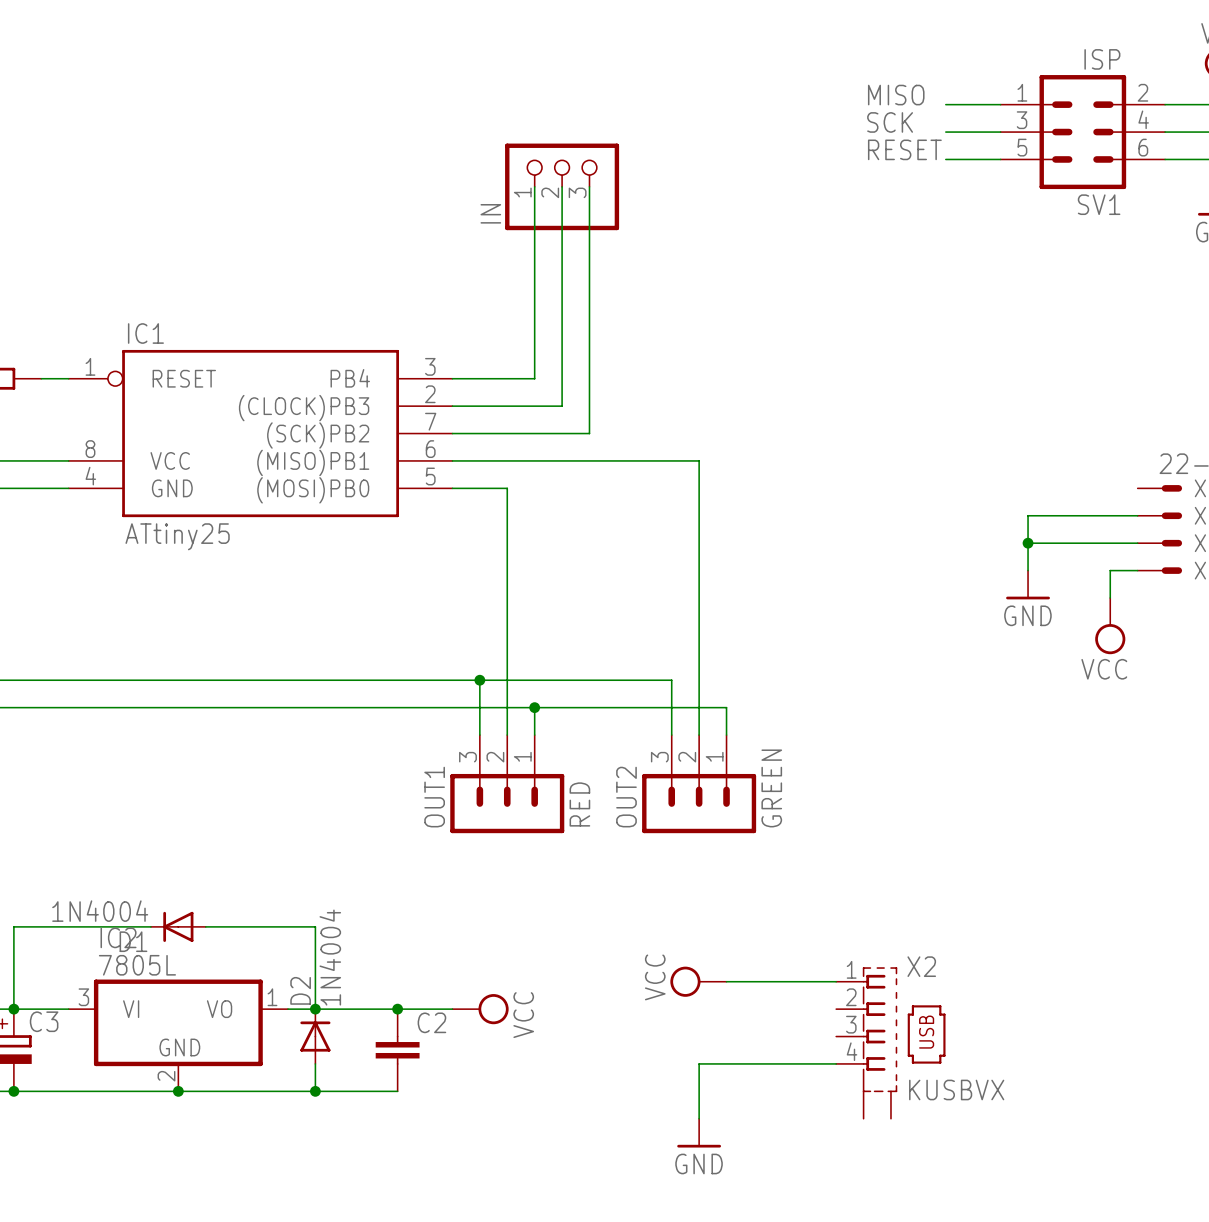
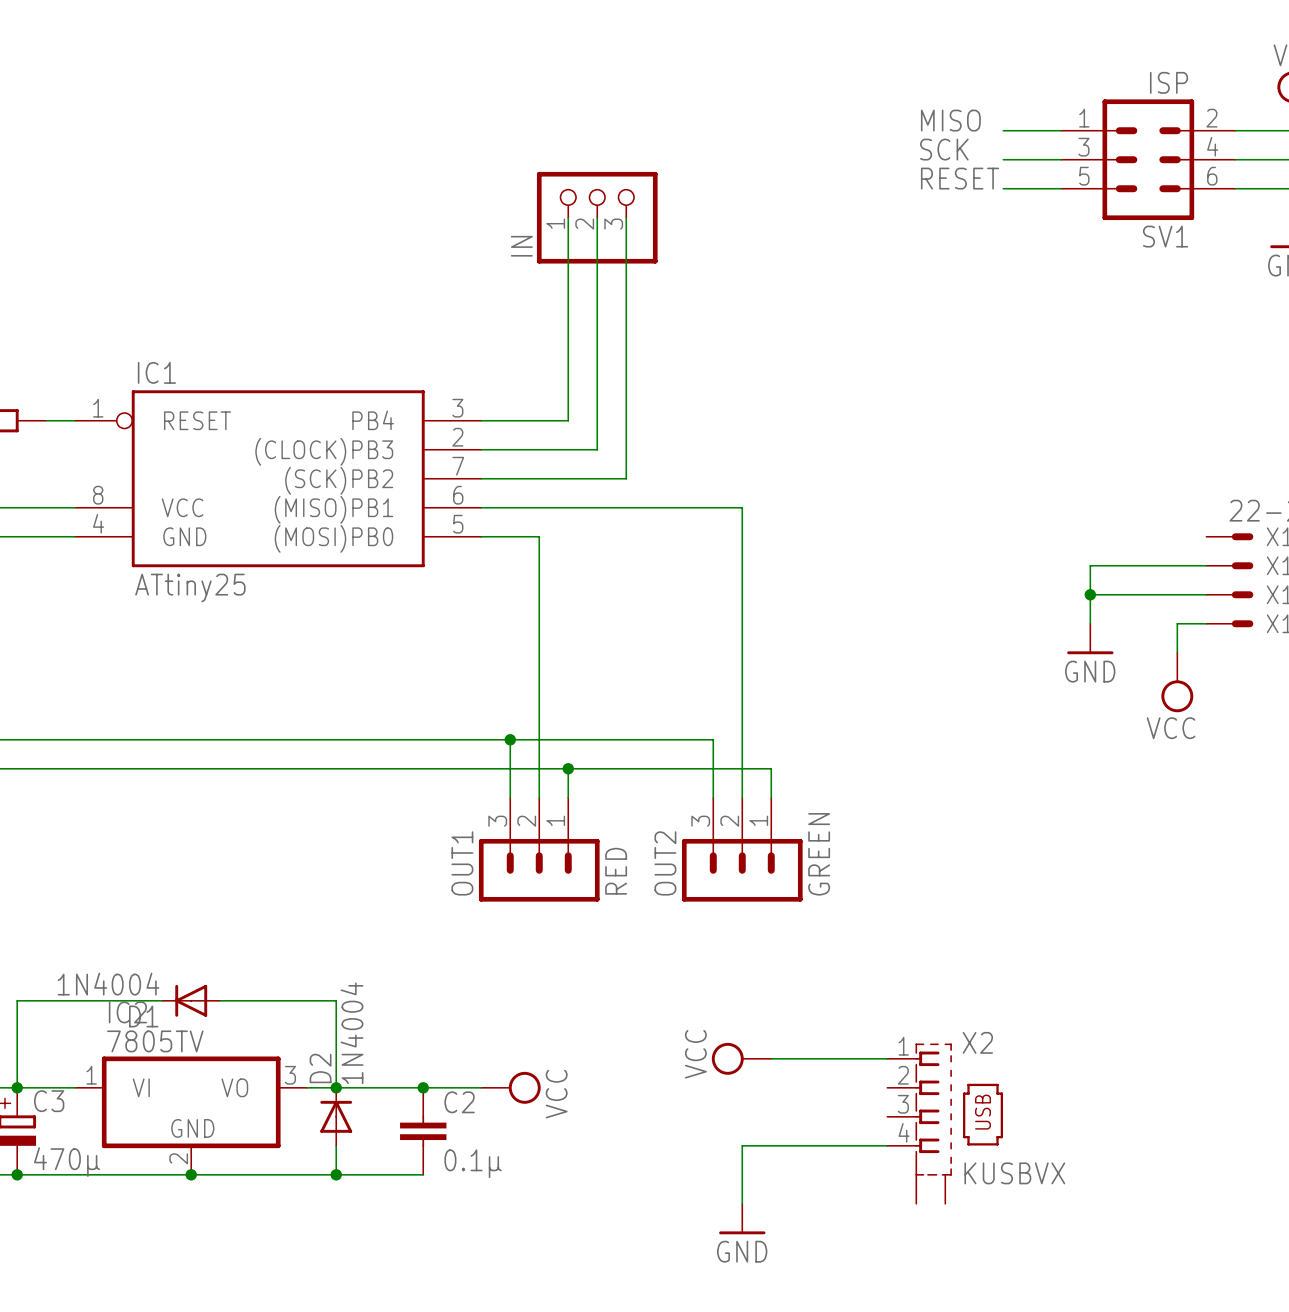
IC2 value: 7805L (137, 965) -> 7805TV (155, 1041)
IC2 pin number: 3 (83, 997) -> 1 (91, 1075)
IC2 pin number: 1 (272, 997) -> 3 (290, 1075)
C3 value: none -> 470µ (66, 1162)
C2 value: none -> 0.1µ (473, 1163)

